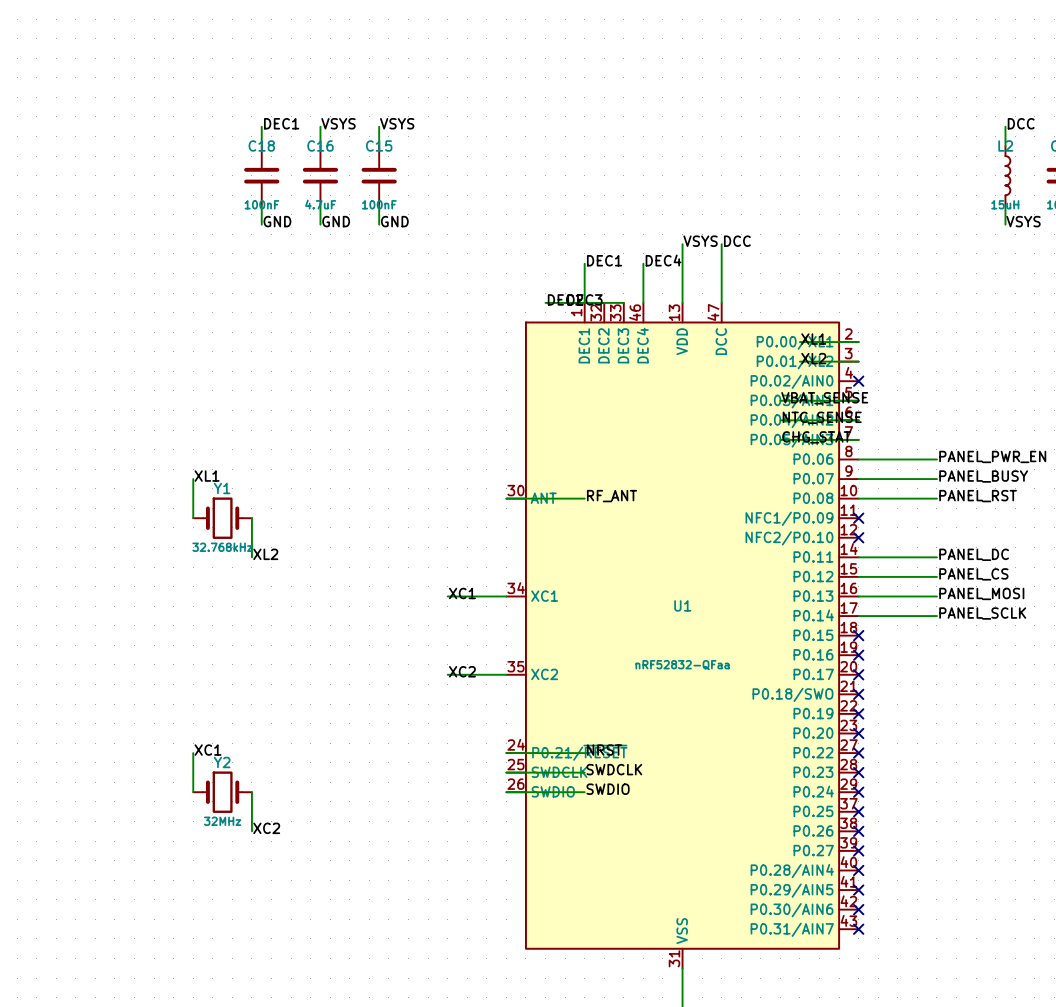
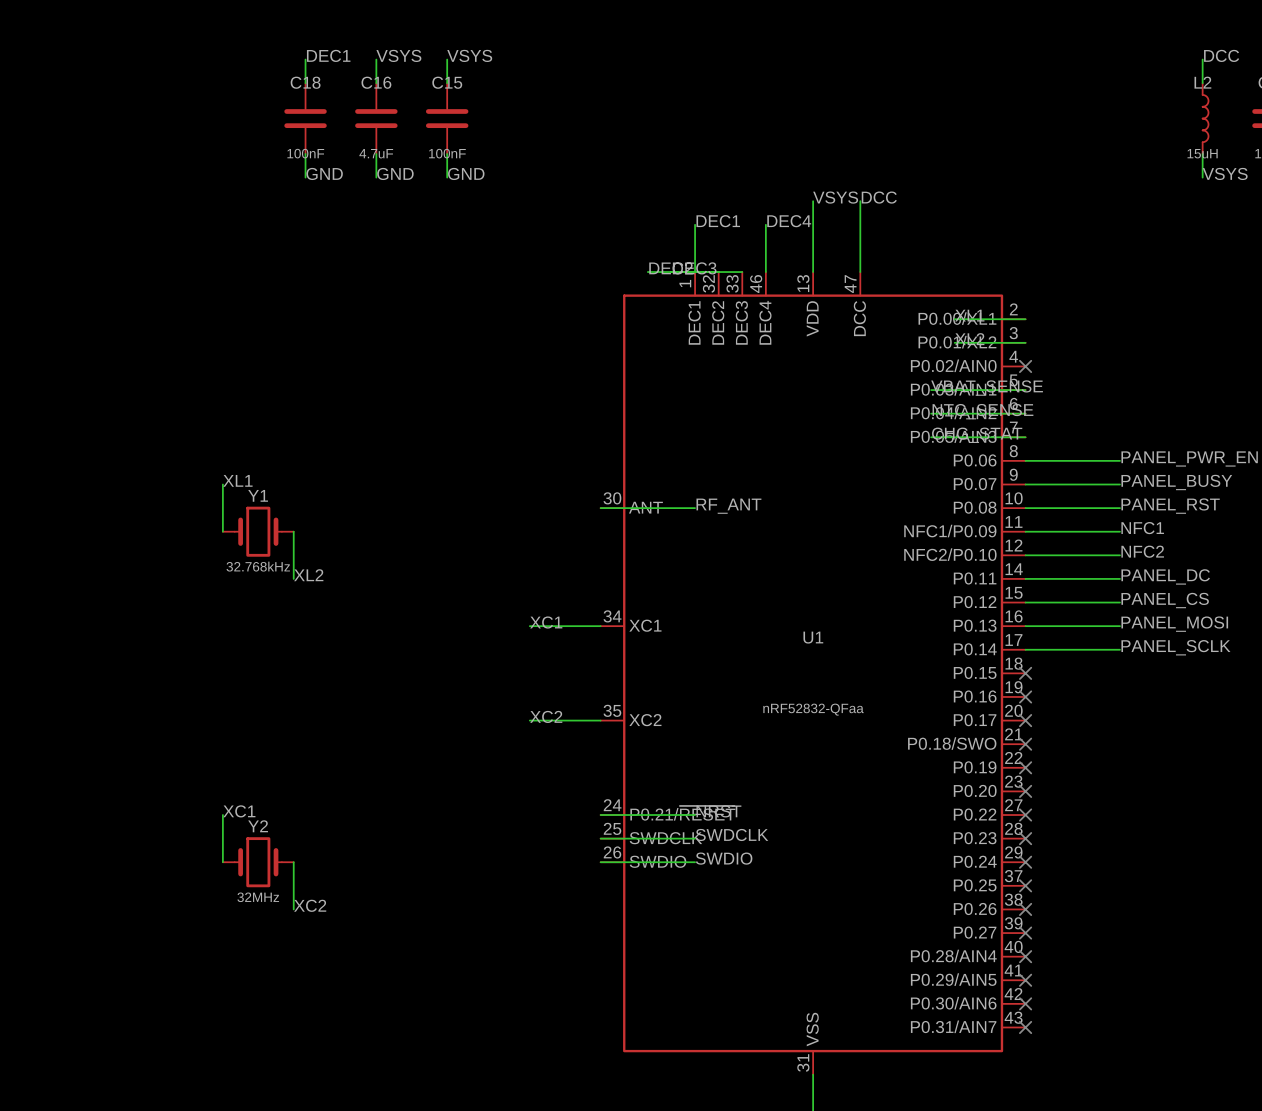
label: none -> NFC1 (1142, 528)
wire: none -> (1025, 531) (1120, 531)
no-connect mark: (858, 518) -> none
label: none -> NFC2 (1142, 551)
wire: none -> (1025, 555) (1120, 555)
no-connect mark: (858, 537) -> none

